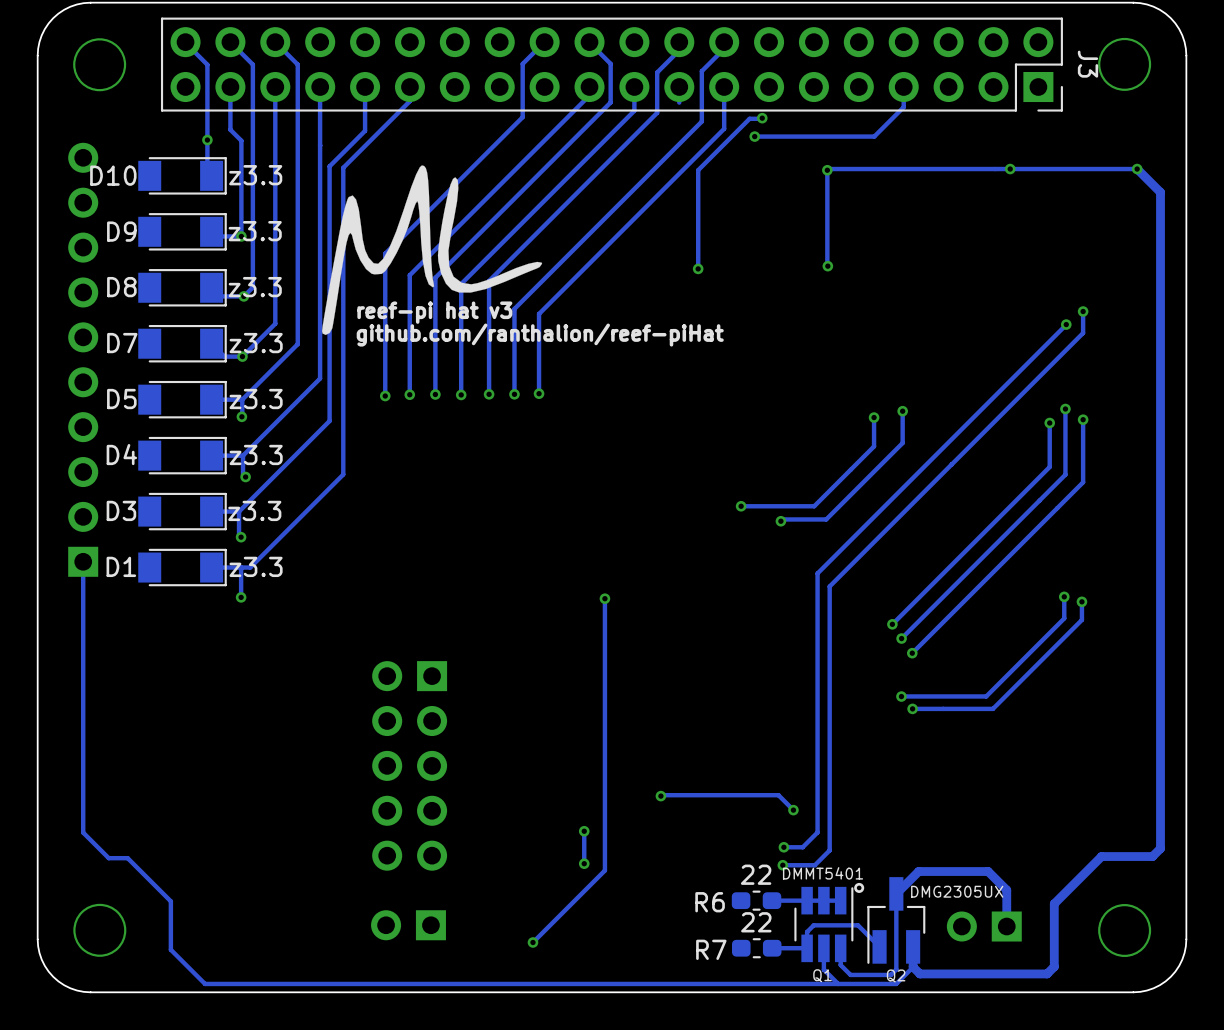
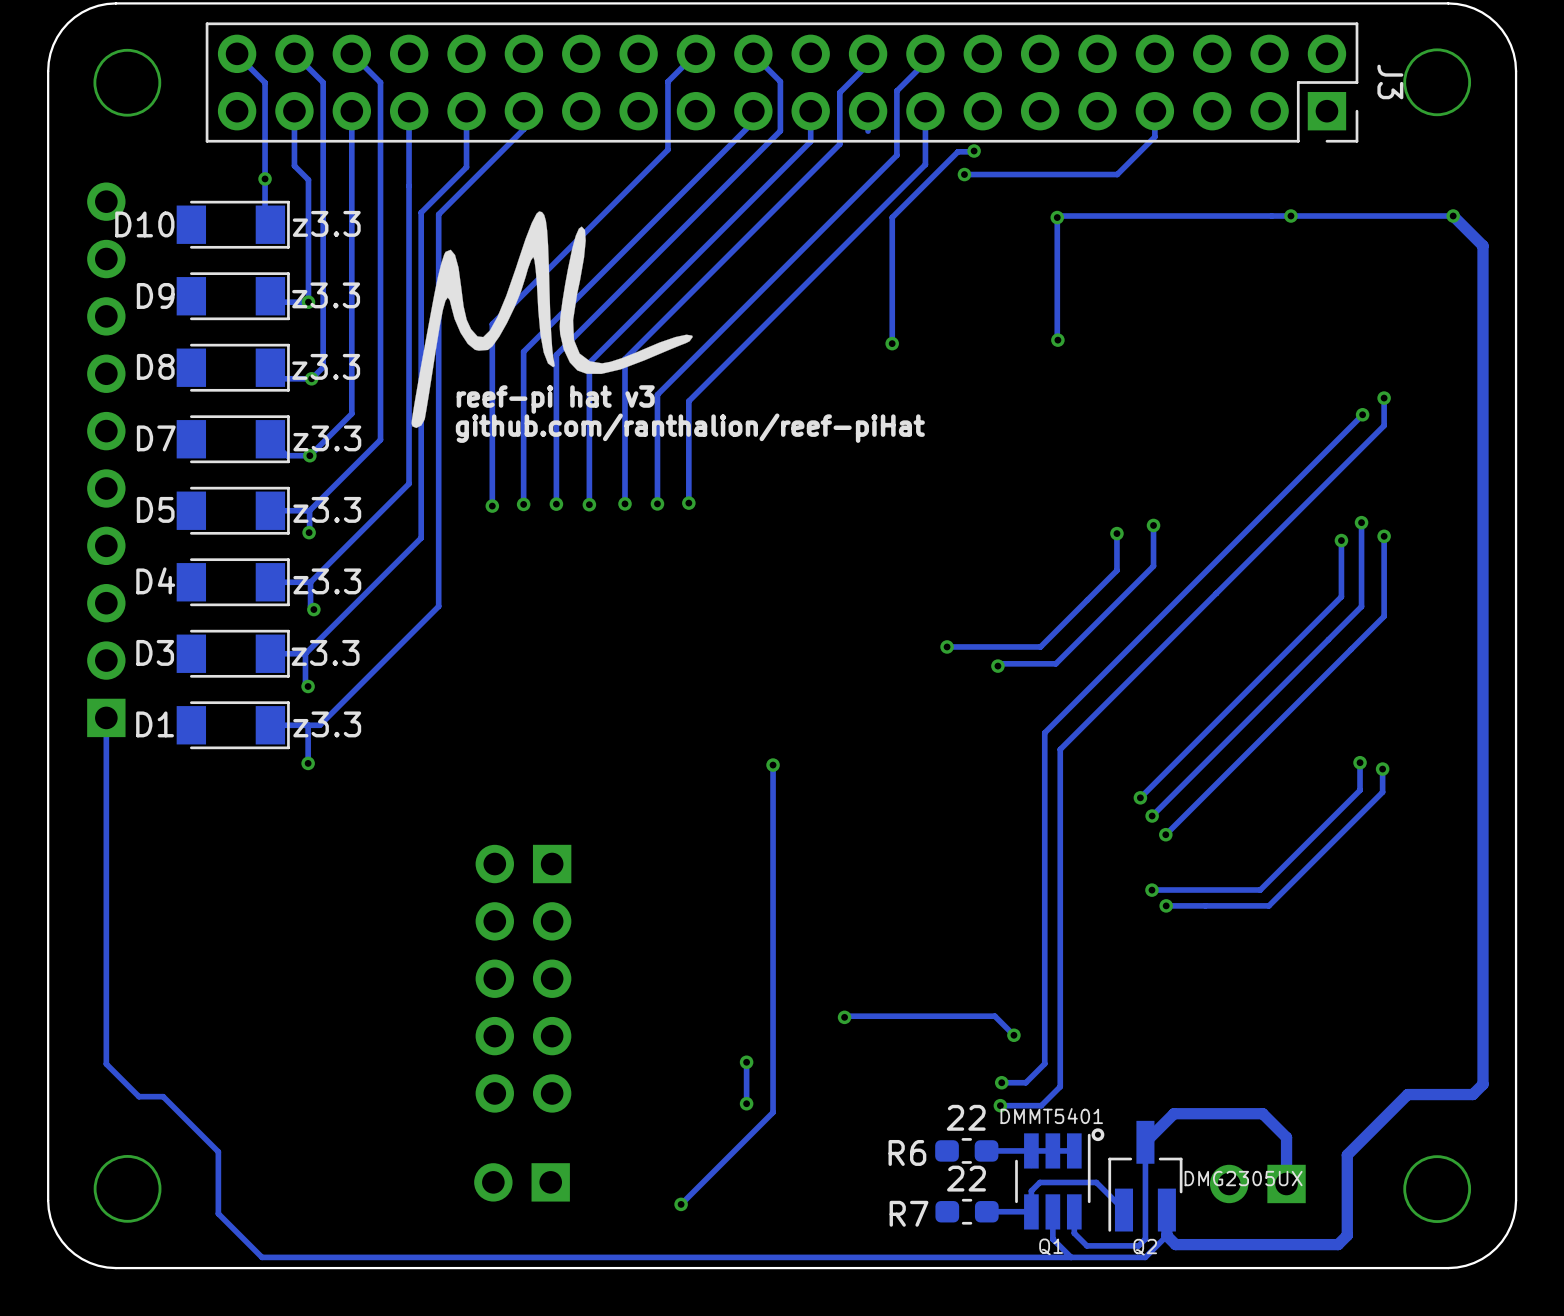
Q2 value position: DMG2305UX (957, 891) -> DMG2305UX (1243, 1178)

